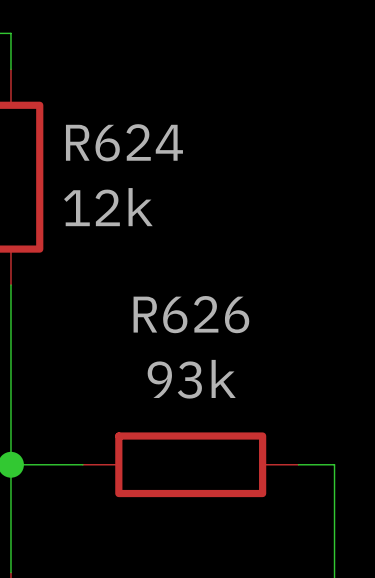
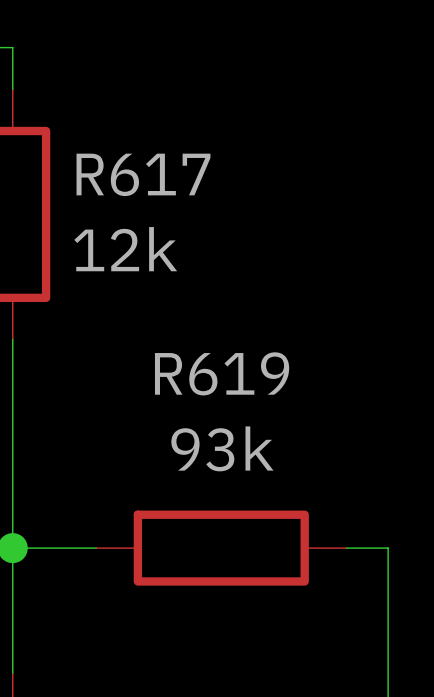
R624 name: R624 (124, 142) -> R617 (143, 174)
R626 name: R626 (191, 314) -> R619 (222, 373)

